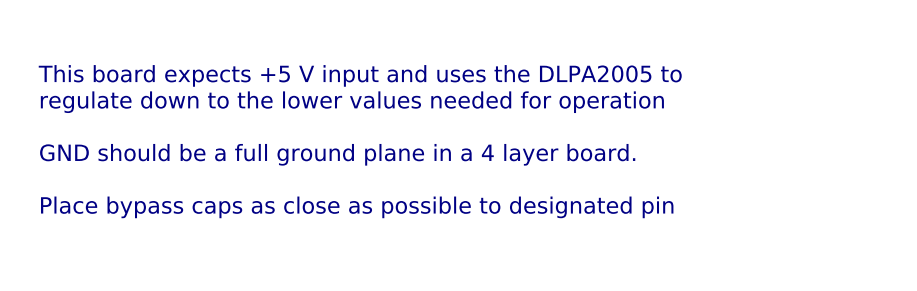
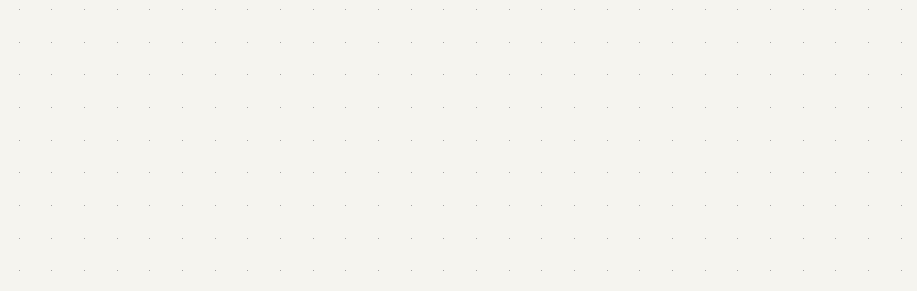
text: This board expects +5 V input and uses the DLPA2005 to (360, 75) -> none
text: regulate down to the lower values needed for operation (352, 102) -> none
text: GND should be a full ground plane in a 4 layer board. (337, 154) -> none
text: Place bypass caps as close as possible to designated pin (357, 207) -> none

